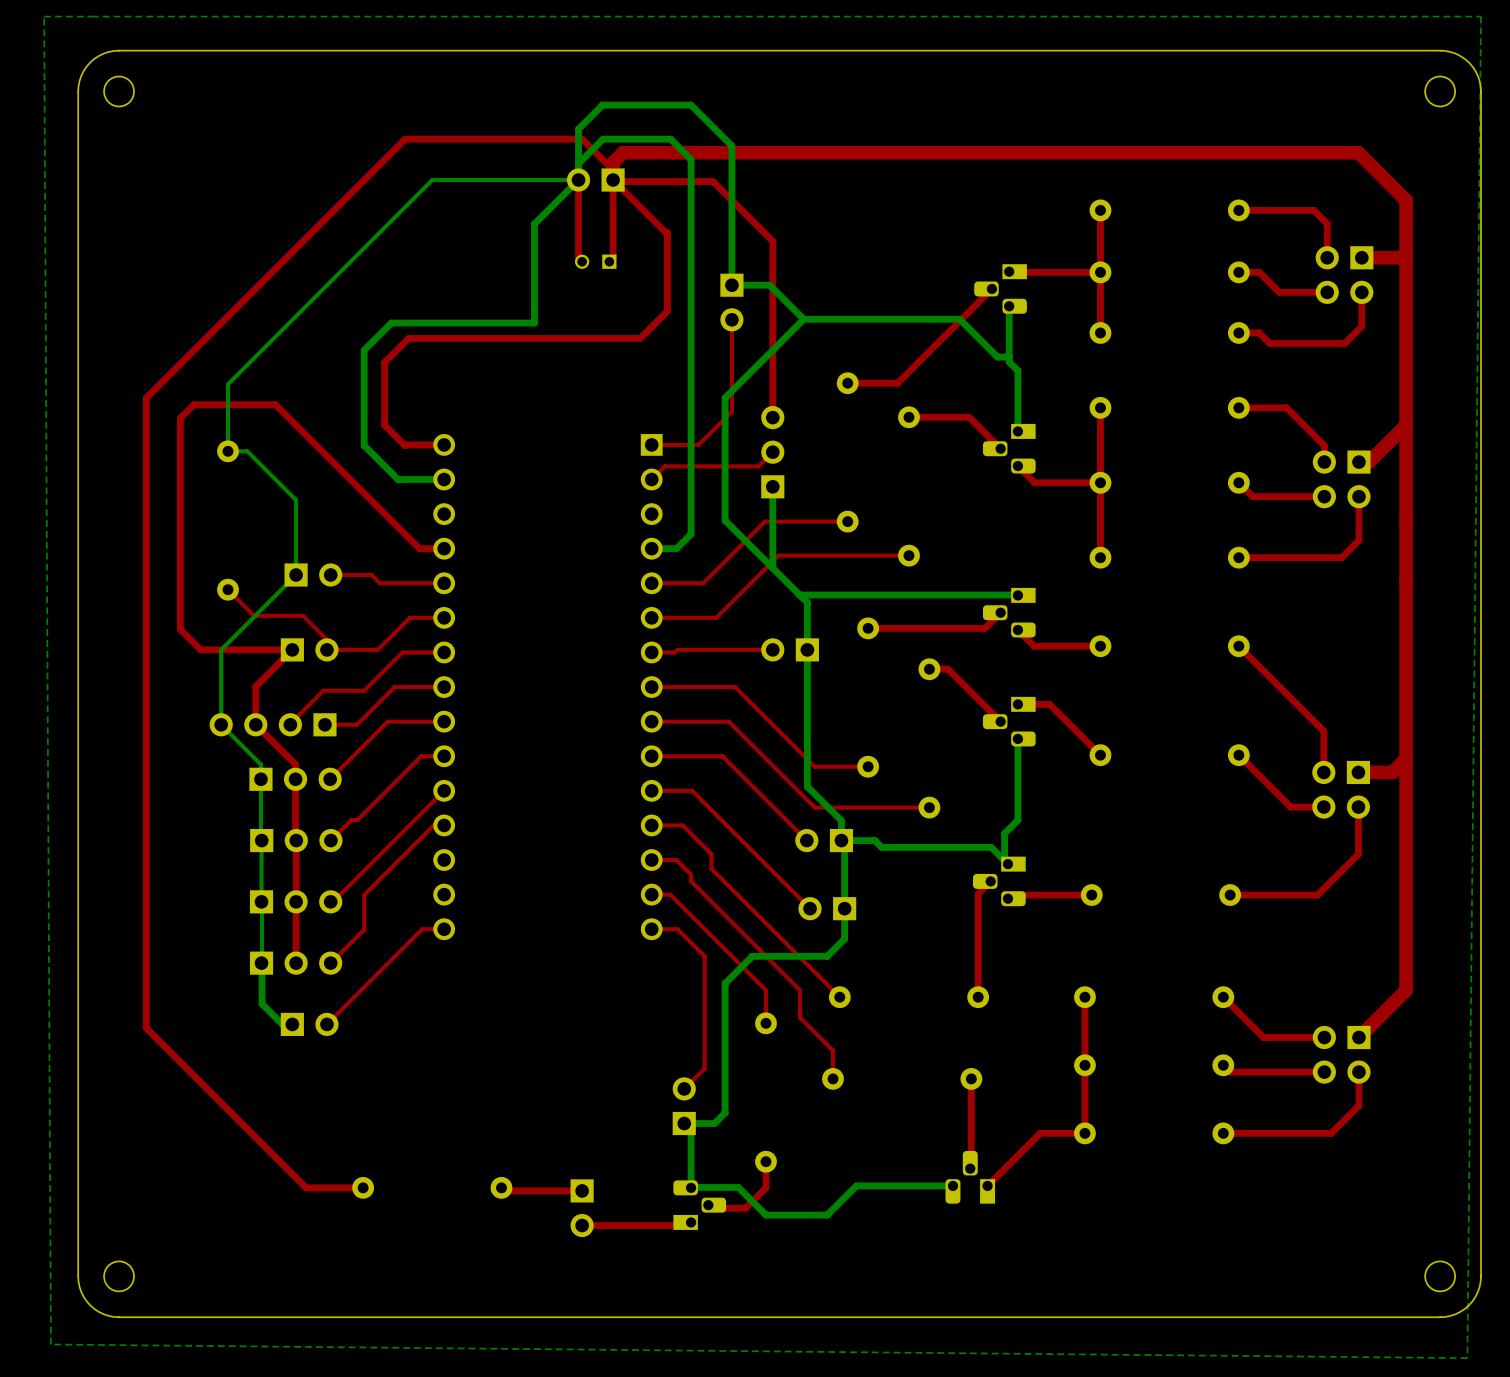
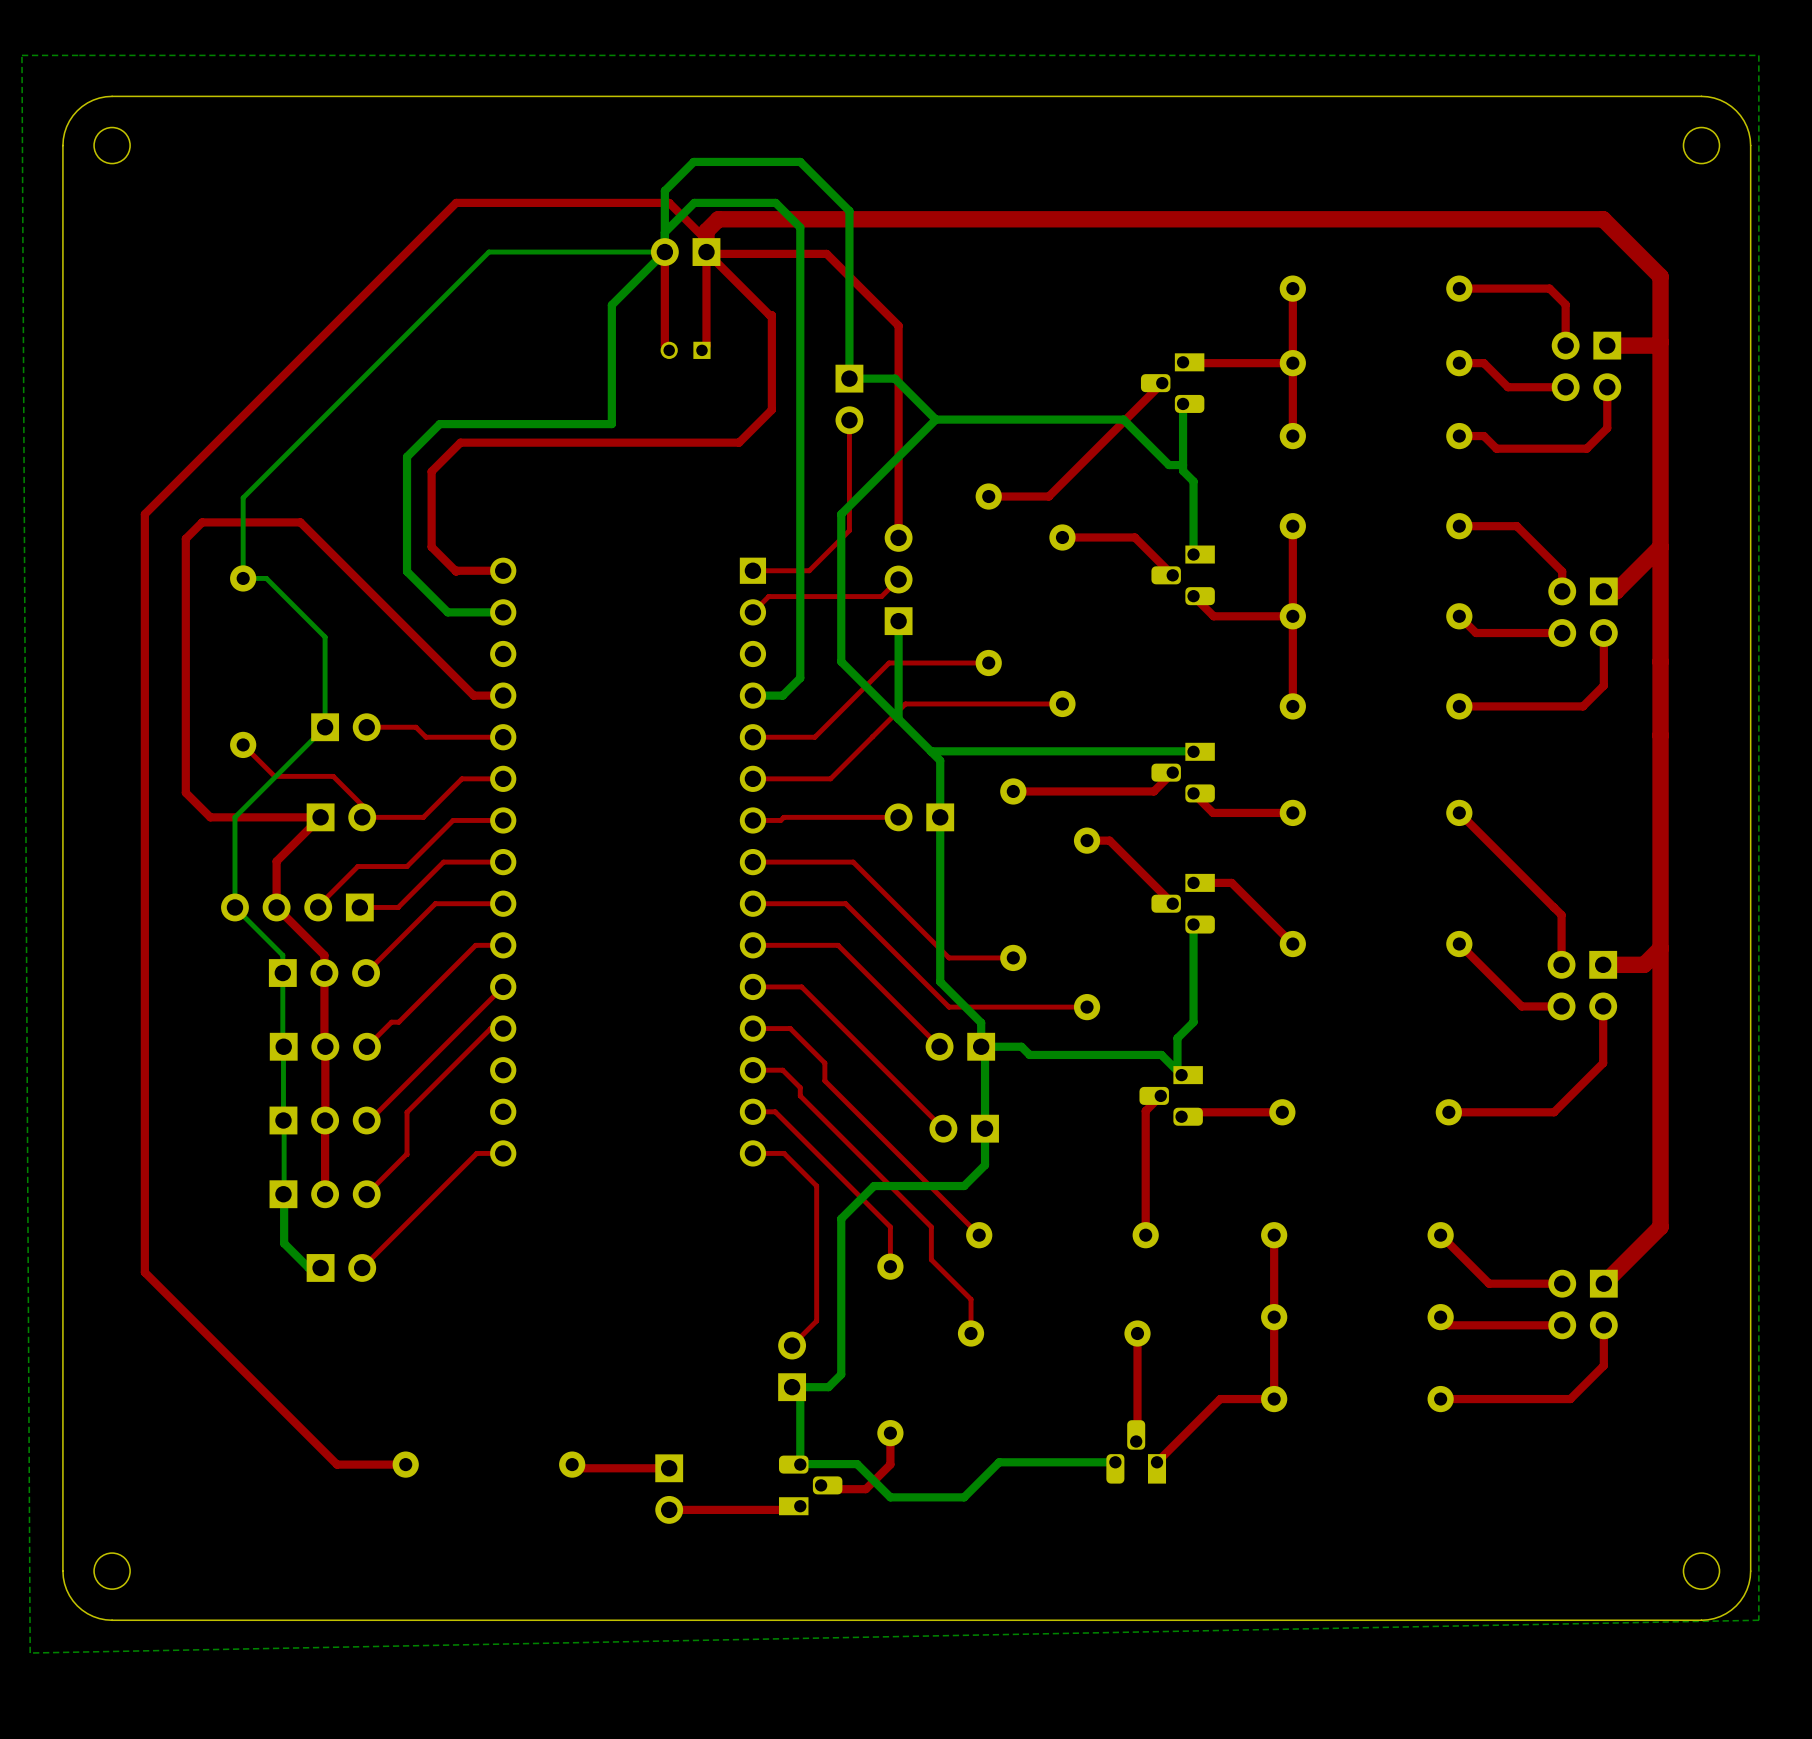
bottom zone outline: (1481, 16) (1467, 1358) (50, 1344) -> (1750, 55) (1758, 55) (1758, 1620) (30, 1653)

